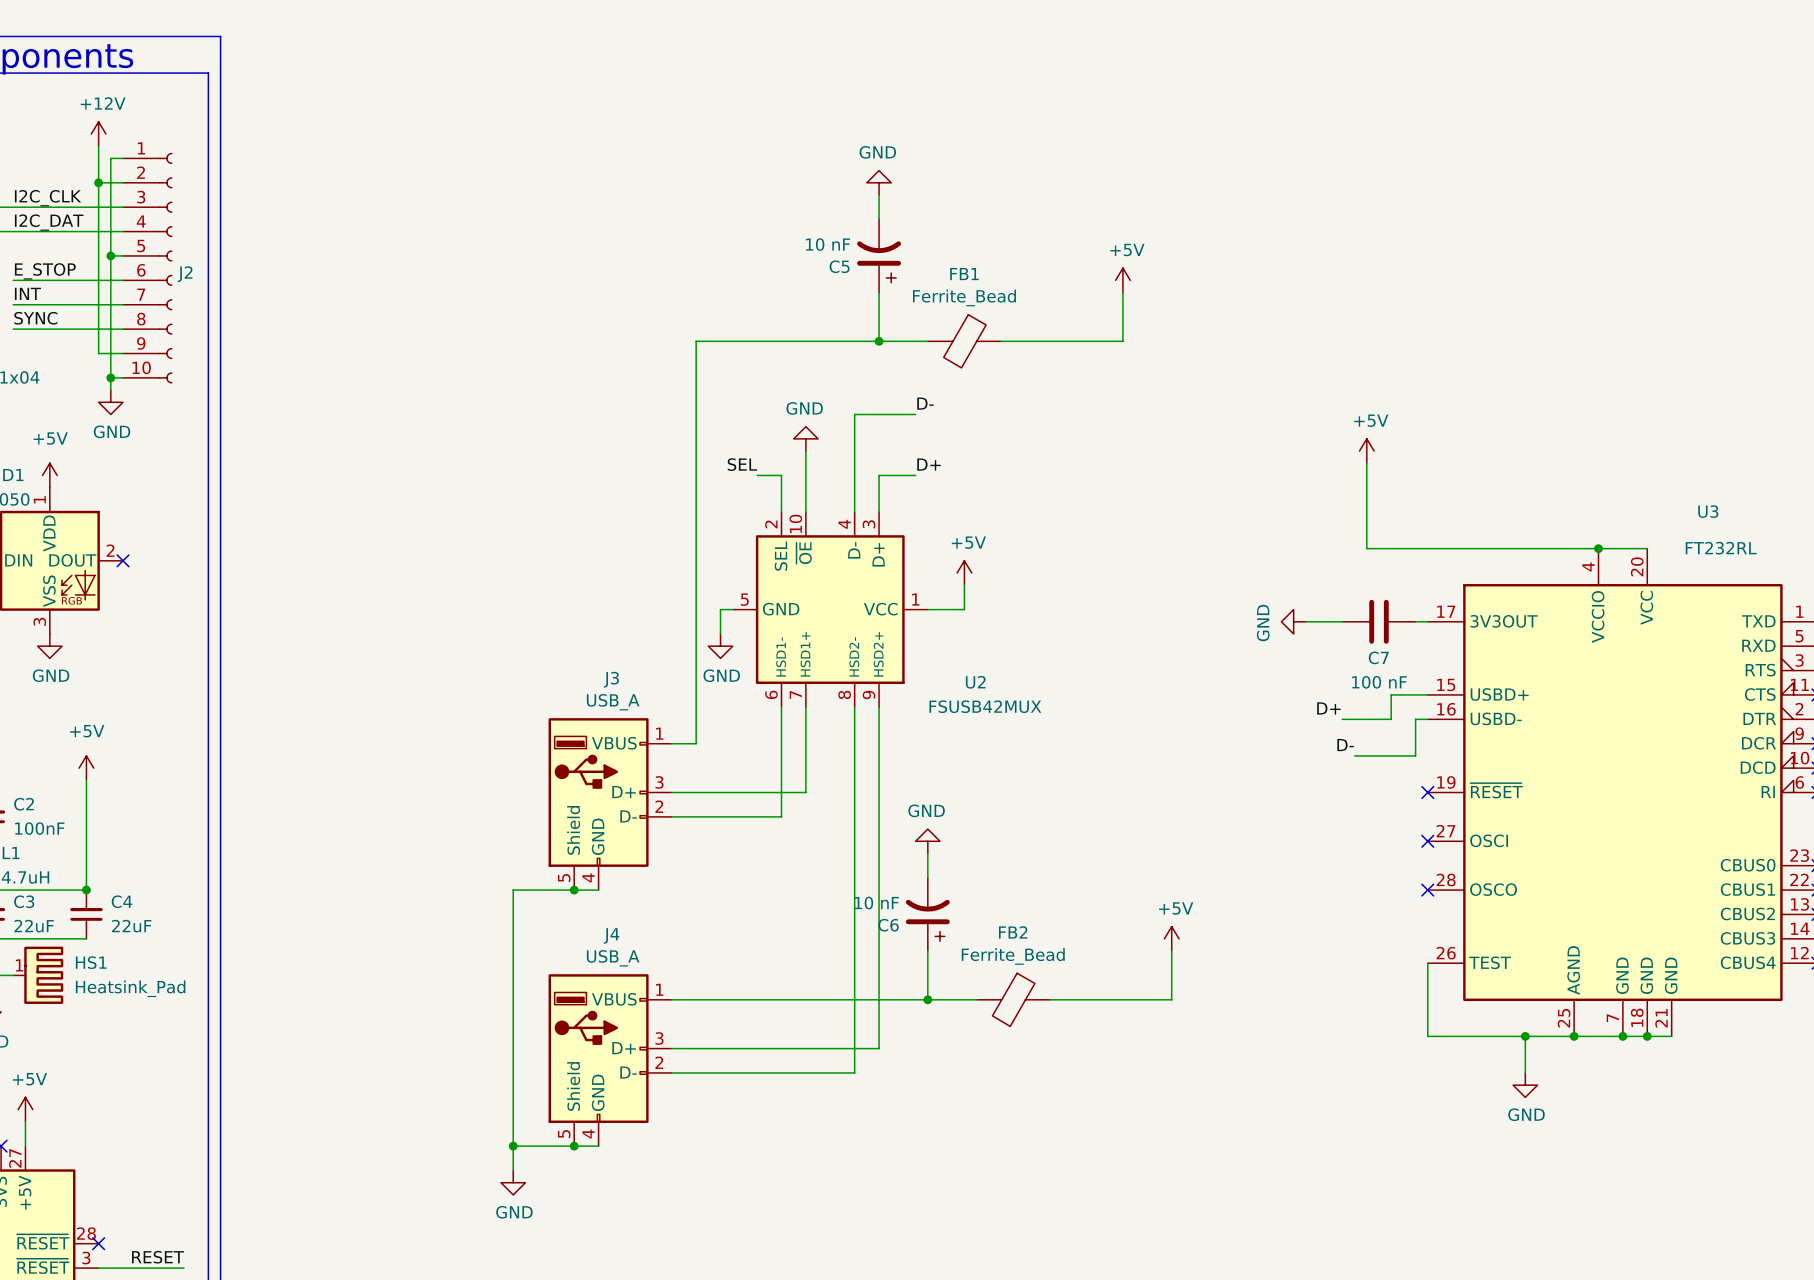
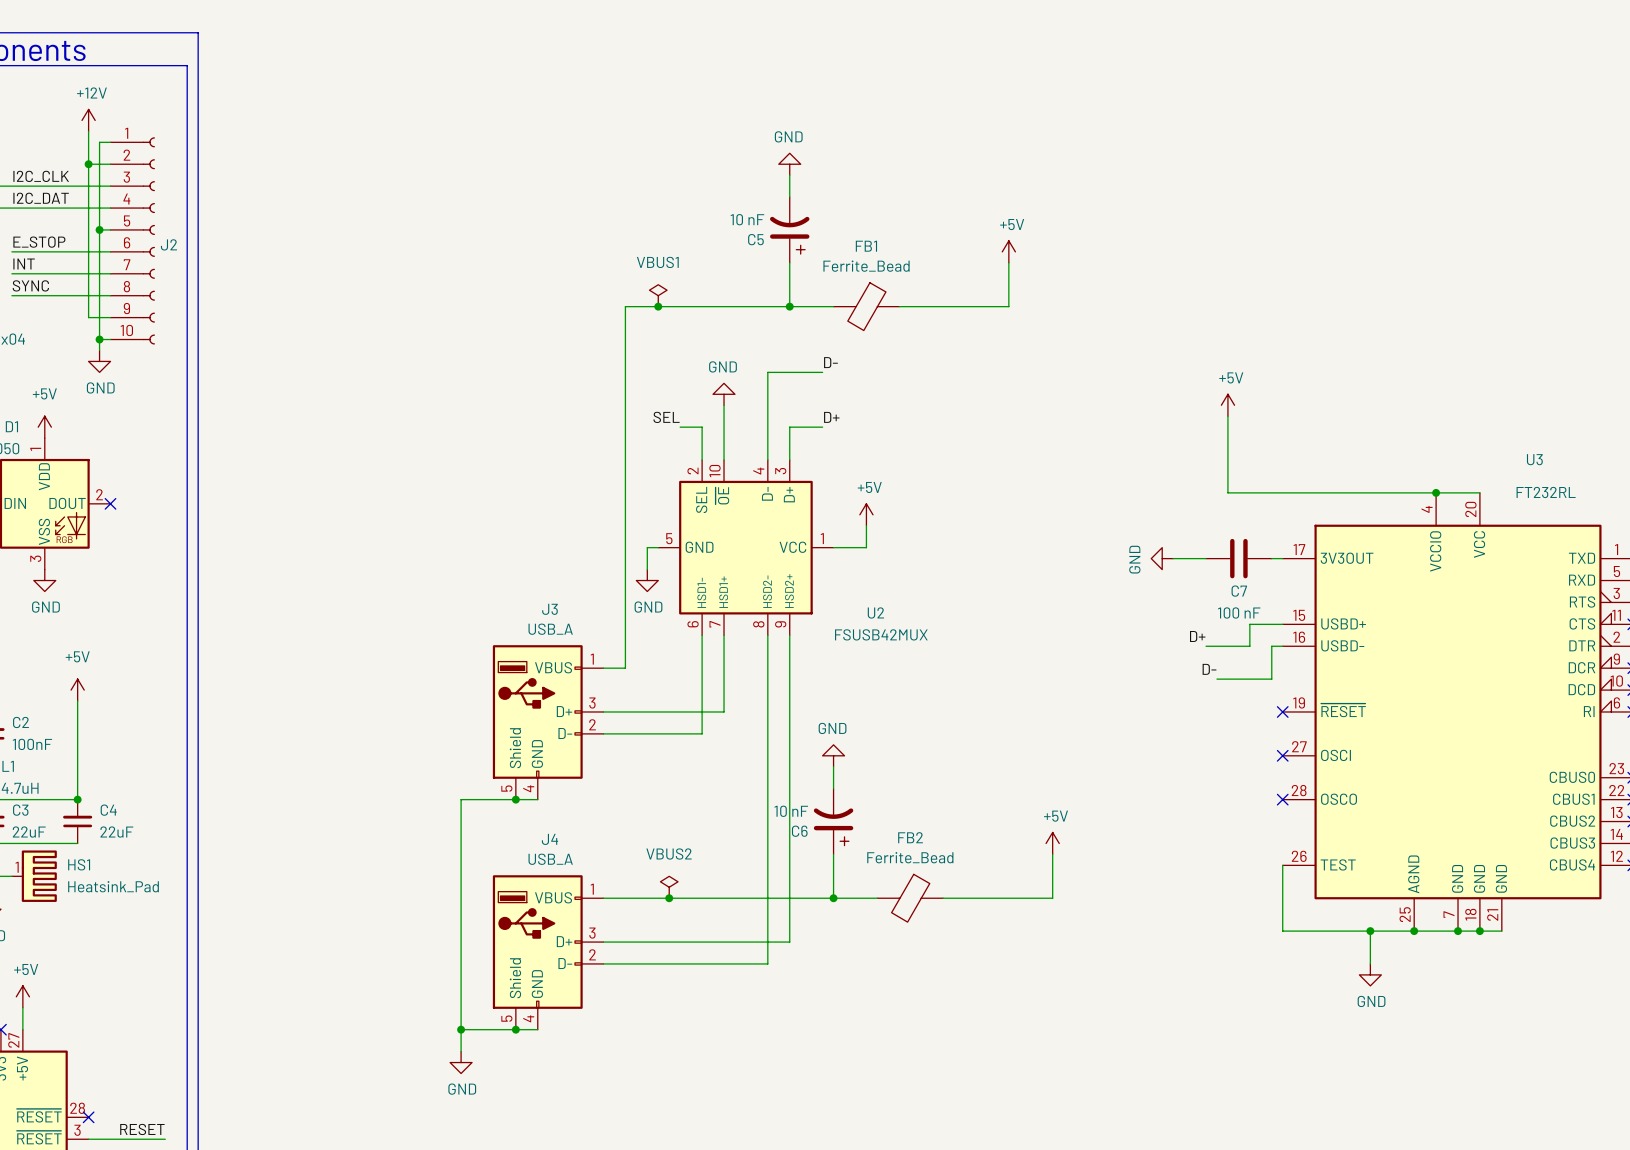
power symbol: none -> VBUS1 (658, 295)
junction: none -> (658, 306)
power symbol: none -> VBUS2 (669, 887)
junction: none -> (669, 898)

